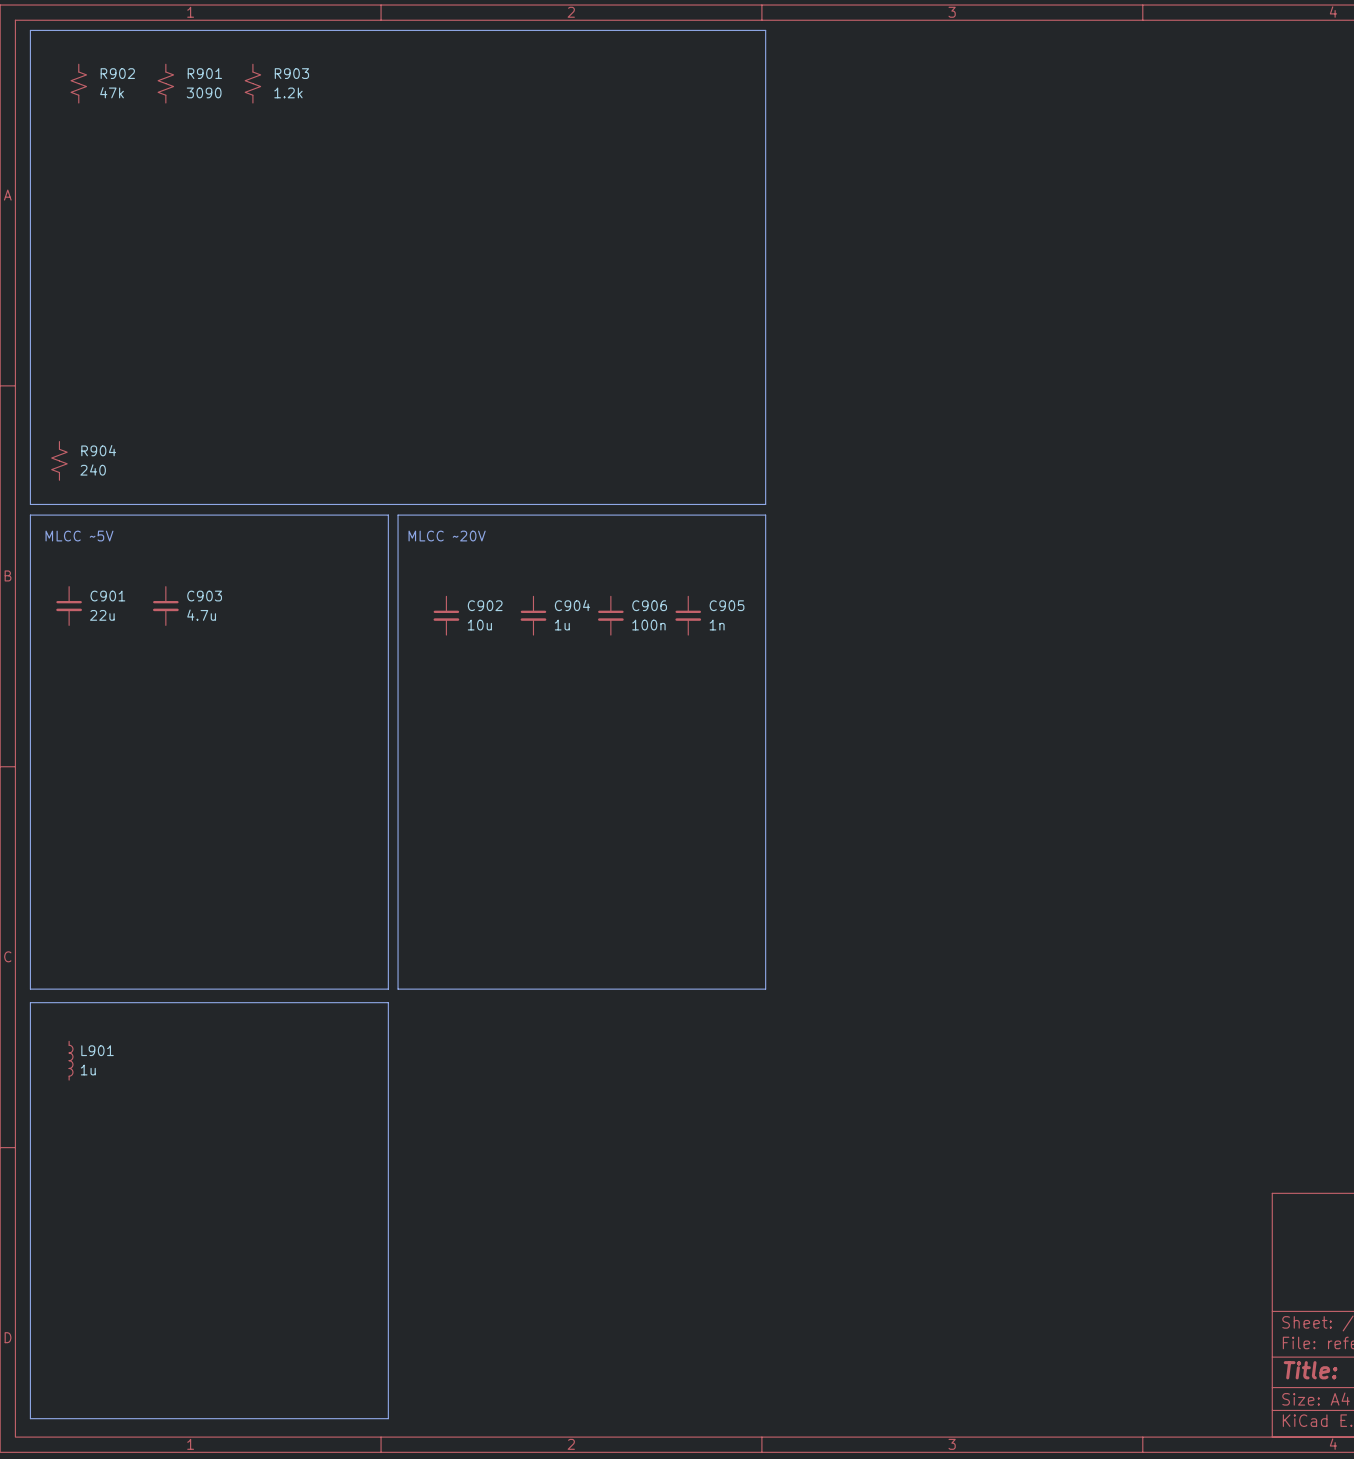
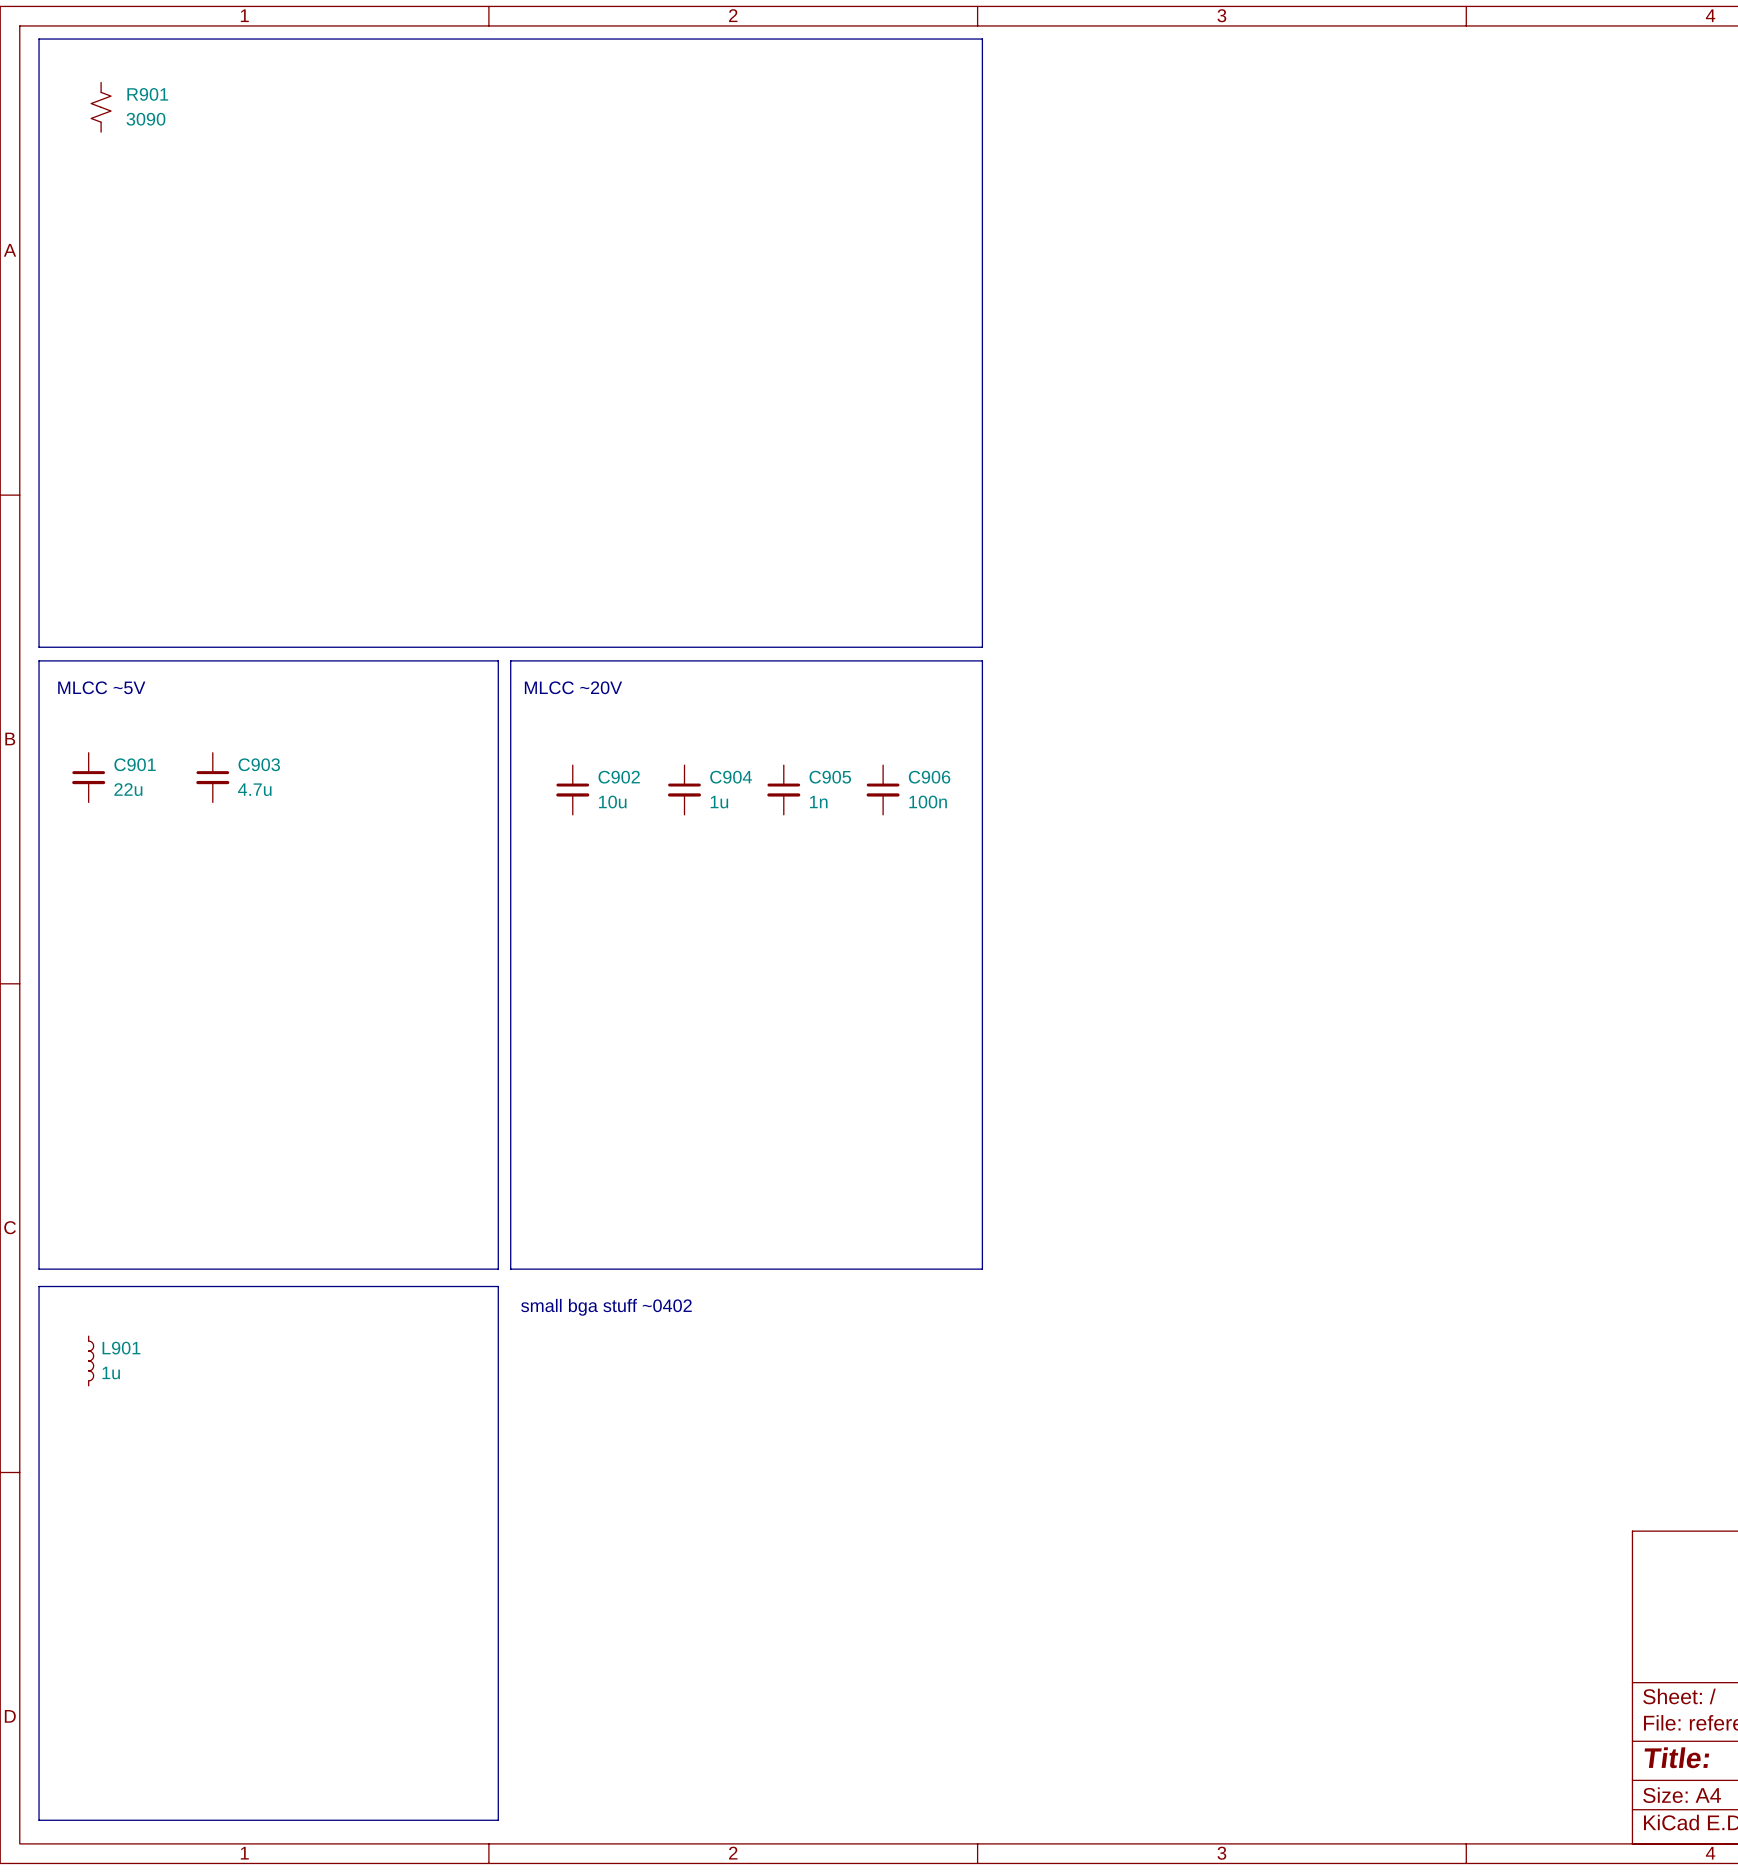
R902 name: R902 (117, 73) -> R901 (147, 94)
R901: 3090 (165, 83) -> none
R903: 1.2k (252, 83) -> none
R902 value: 47k (112, 92) -> 3090 (145, 119)
R904: 240 (59, 460) -> none
C906 name: C906 (649, 605) -> C905 (830, 777)
C905 name: C905 (727, 605) -> C906 (929, 777)
C906 value: 100n (648, 625) -> 1n (818, 802)
C905 value: 1n (717, 625) -> 100n (928, 802)
text: none -> small bga stuff ~0402 (606, 1307)

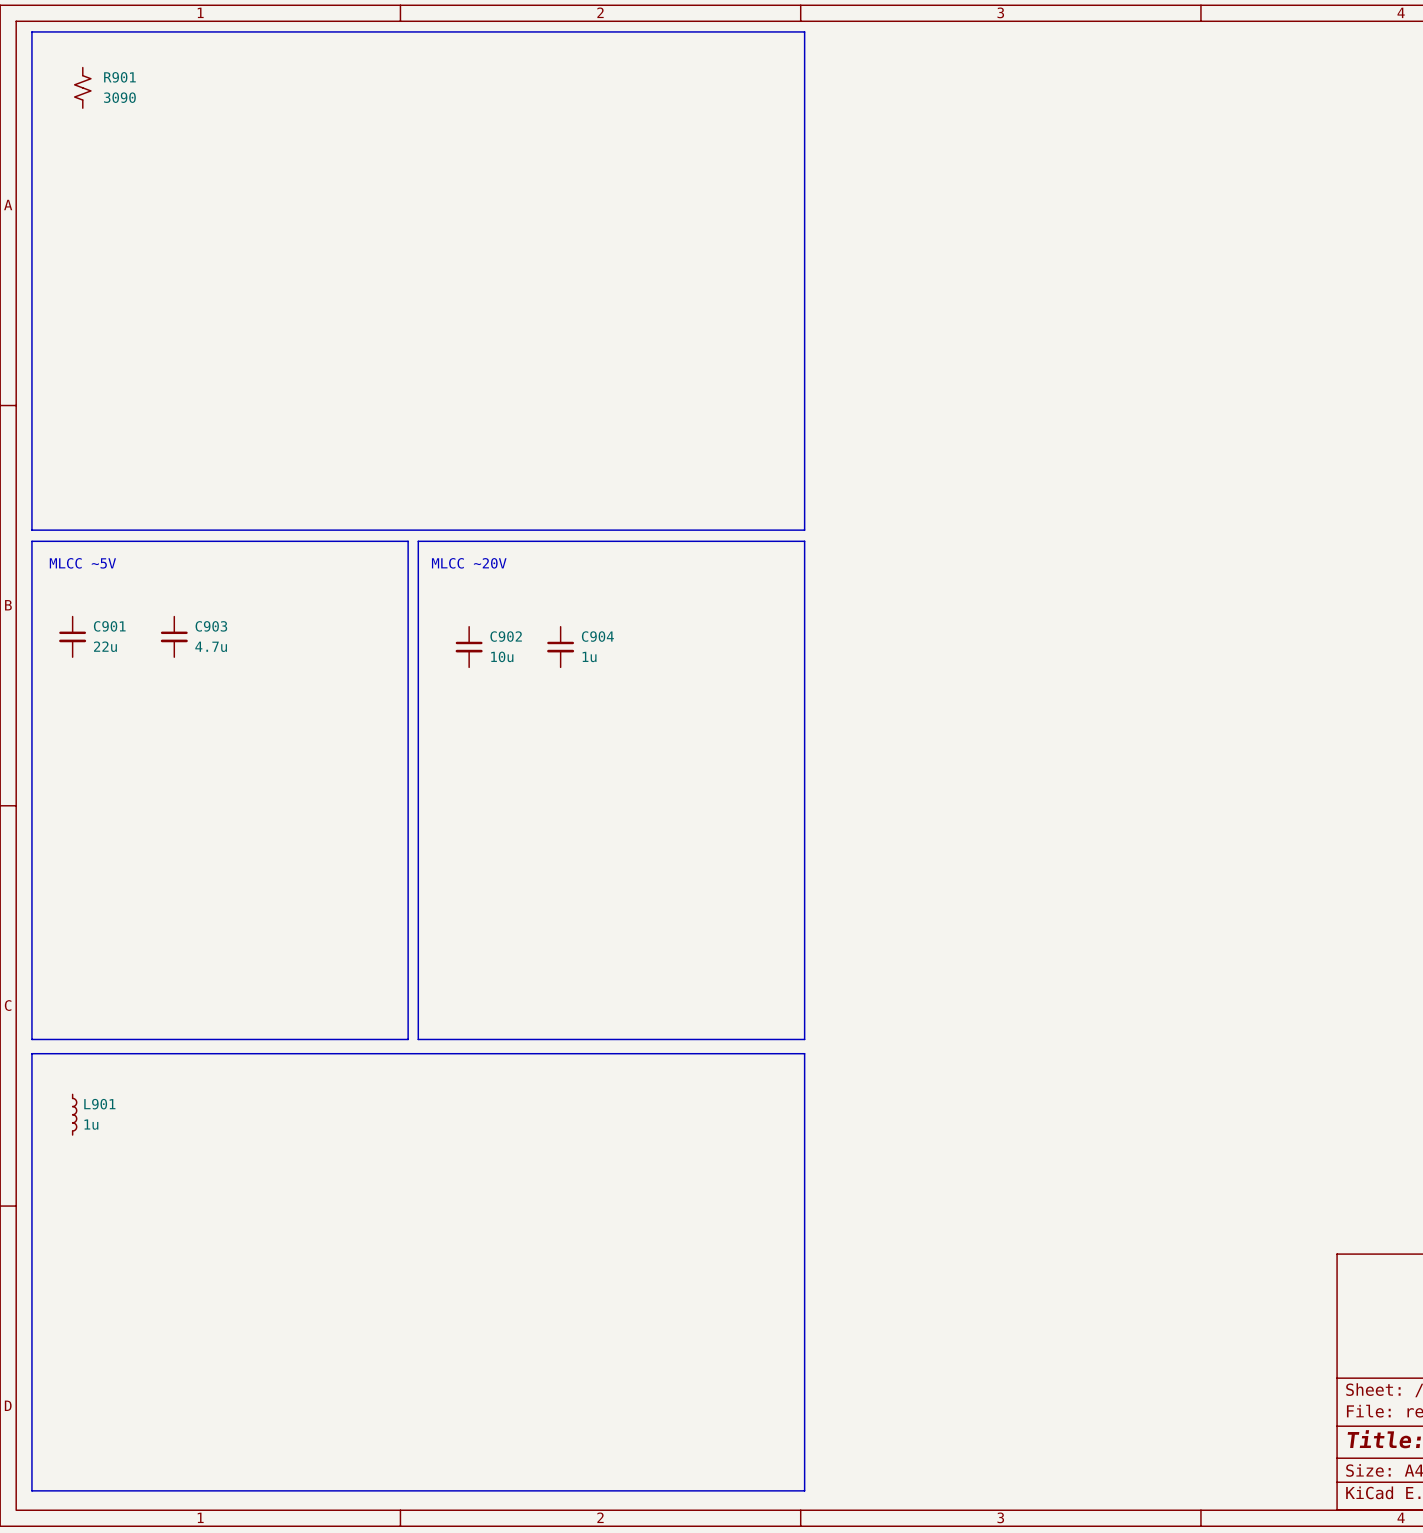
C905: 1n (783, 790) -> none
C906: 100n (883, 790) -> none
line: (498, 1286) (498, 1820) -> (408, 1053) (804, 1053) (804, 1490) (408, 1490)
text: small bga stuff ~0402 (606, 1307) -> none

